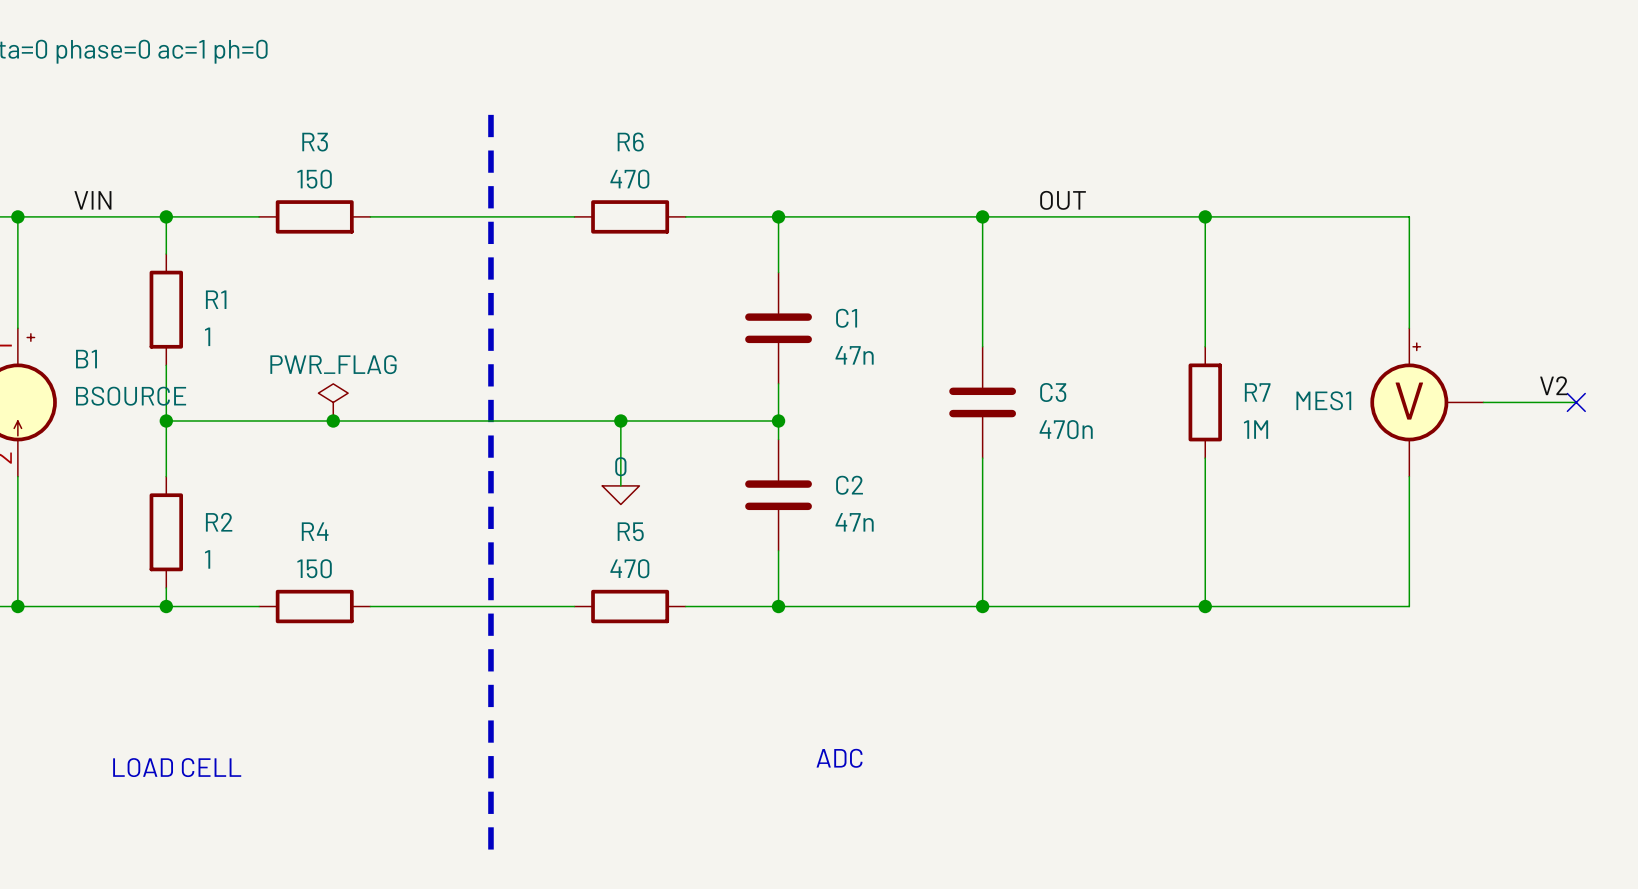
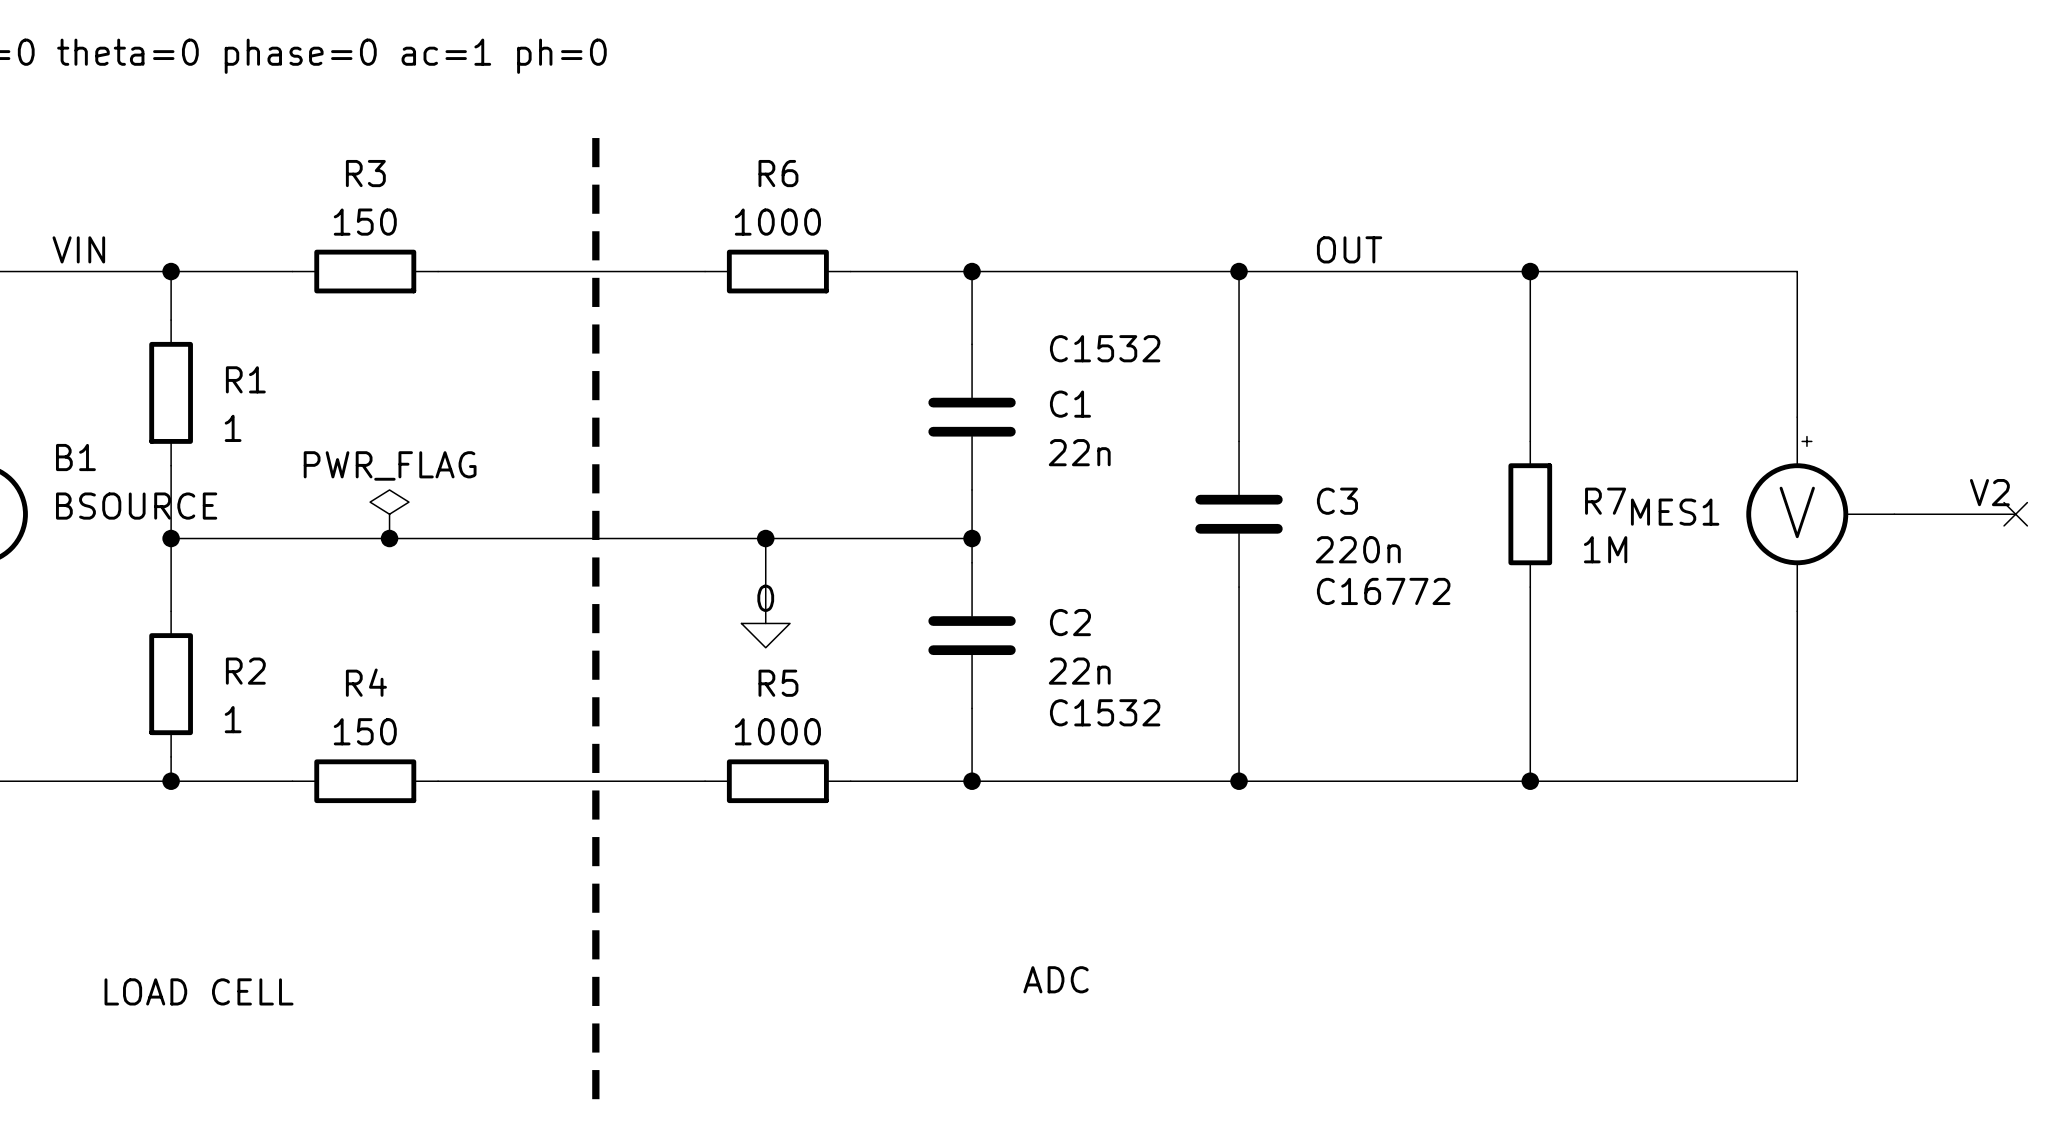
R6 value: 470 (629, 179) -> 1000 (777, 222)
text: none -> C1532 (1105, 348)
C1 value: 47n (854, 355) -> 22n (1079, 452)
C3 value: 470n (1066, 429) -> 220n (1358, 549)
text: none -> C16772 (1383, 591)
C2 value: 47n (854, 522) -> 22n (1079, 671)
text: none -> C1532 (1105, 712)
R5 value: 470 (629, 568) -> 1000 (777, 731)

